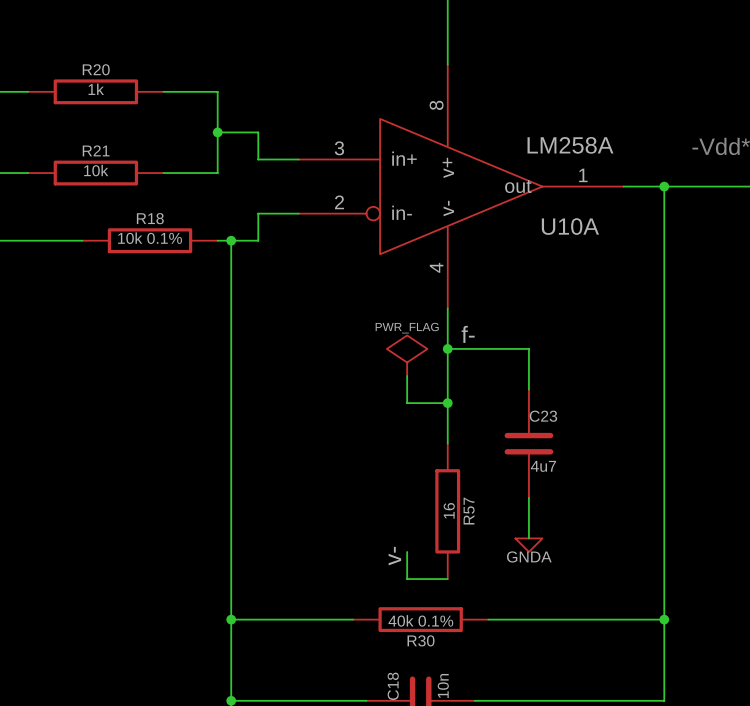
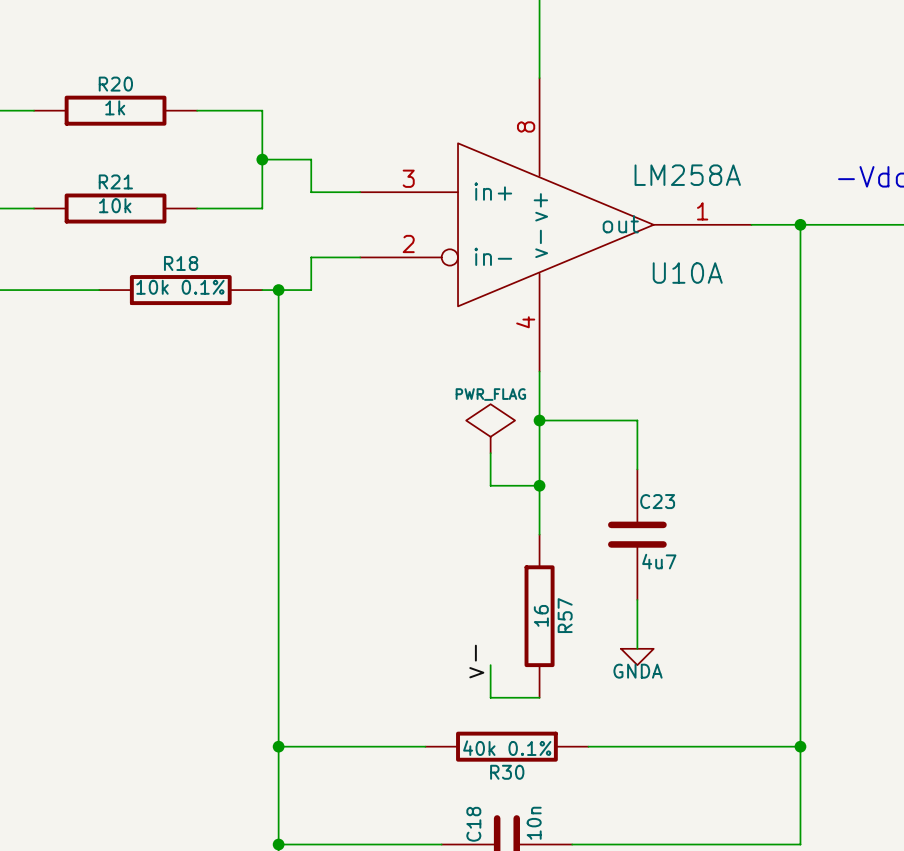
label: f- (468, 334) -> none

